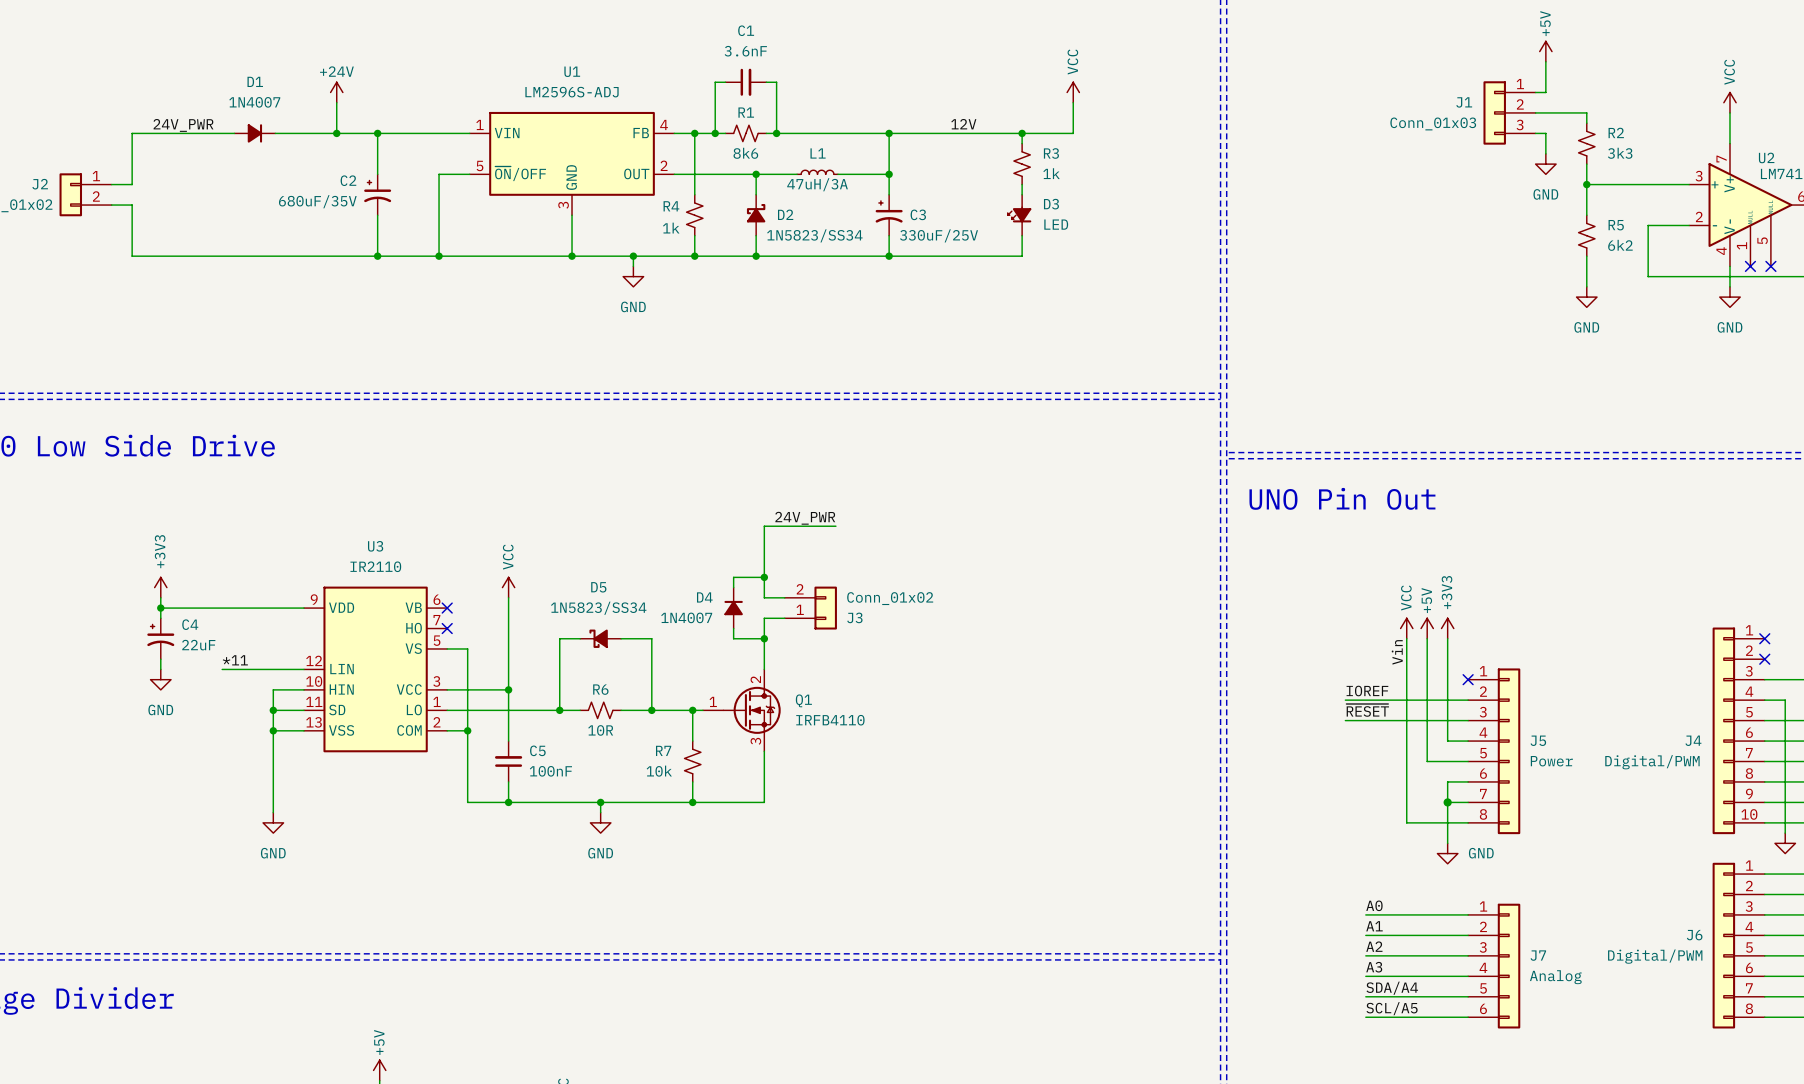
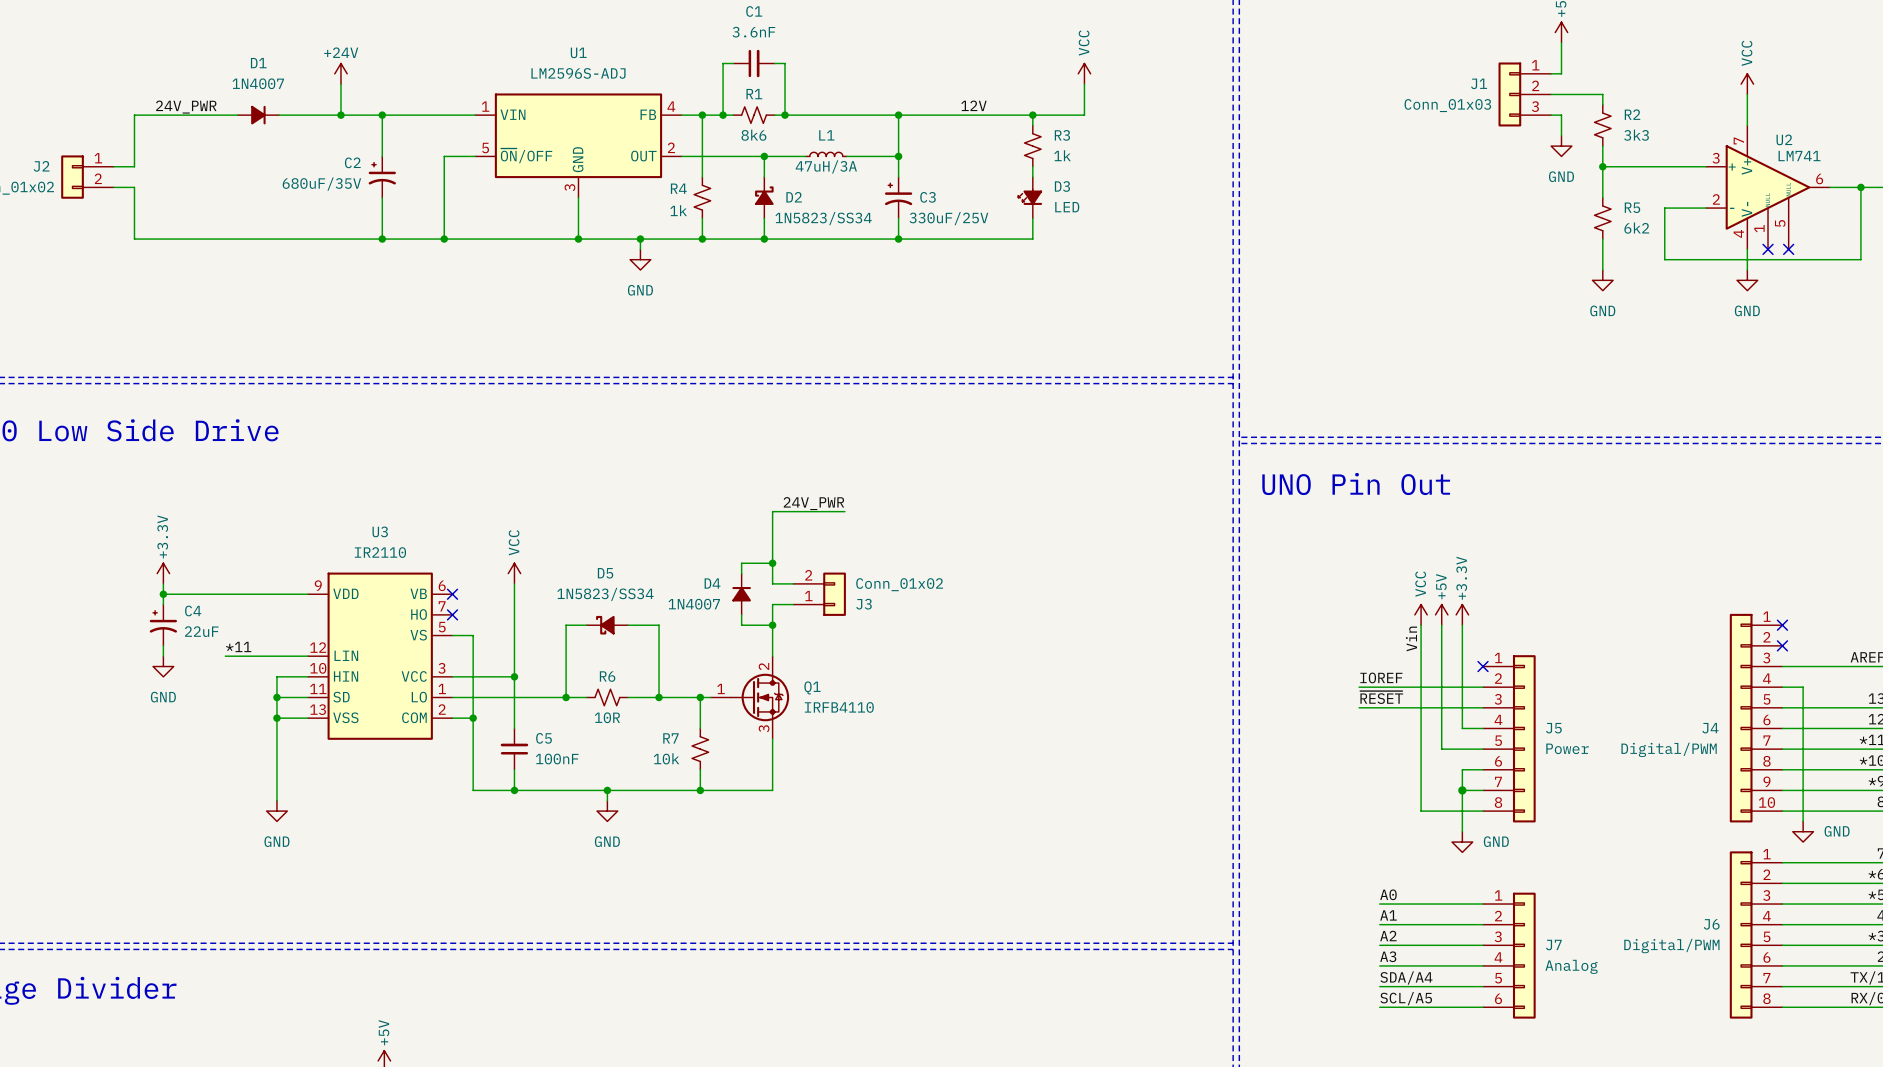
power symbol: +3V3 (160, 587) -> +3.3V (163, 573)
power symbol: +3V3 (1447, 628) -> +3.3V (1462, 614)

